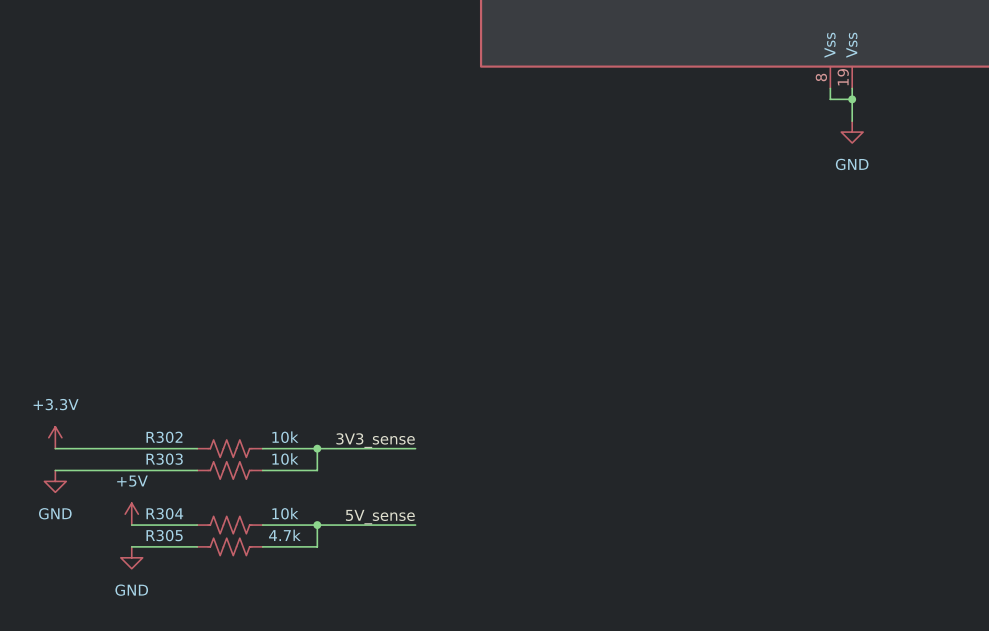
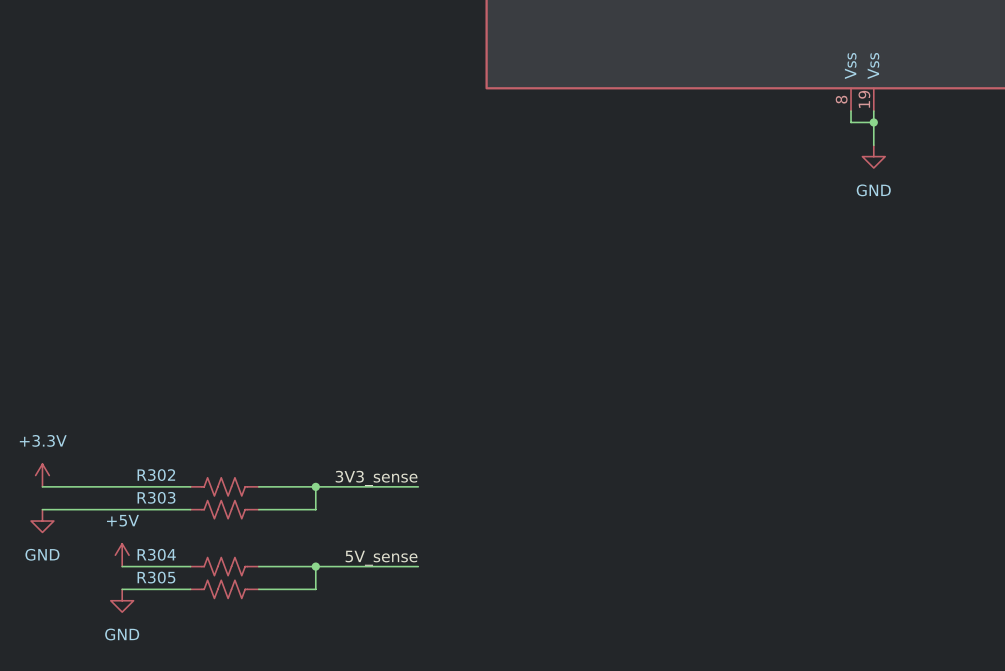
R302 value: 10k (285, 437) -> none
R303 value: 10k (285, 459) -> none
R304 value: 10k (285, 513) -> none
R305 value: 4.7k (284, 535) -> none

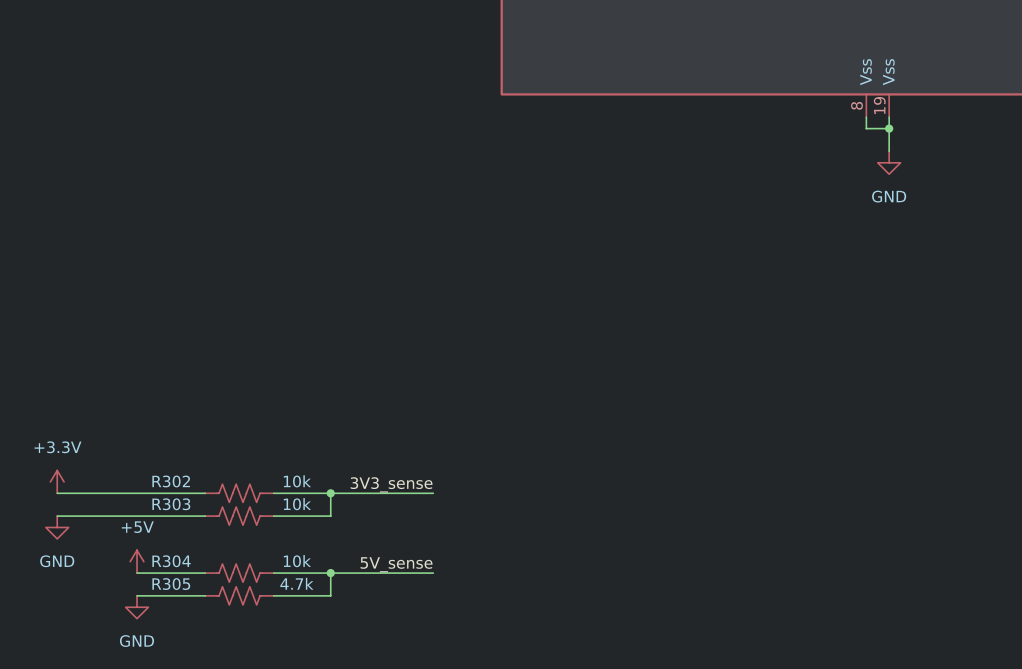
R302 value: none -> 10k (297, 481)
R303 value: none -> 10k (297, 504)
R304 value: none -> 10k (297, 561)
R305 value: none -> 4.7k (296, 583)

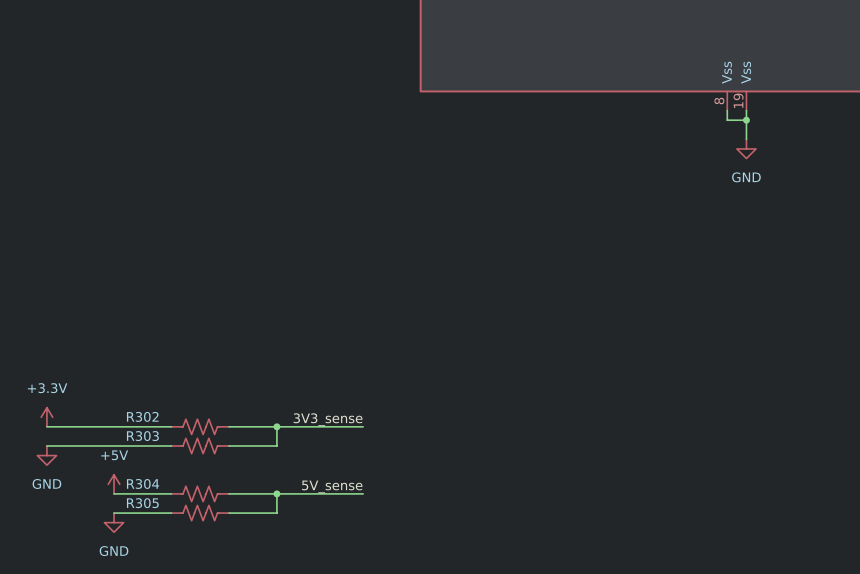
R302 value: 10k (297, 481) -> none
R303 value: 10k (297, 504) -> none
R304 value: 10k (297, 561) -> none
R305 value: 4.7k (296, 583) -> none

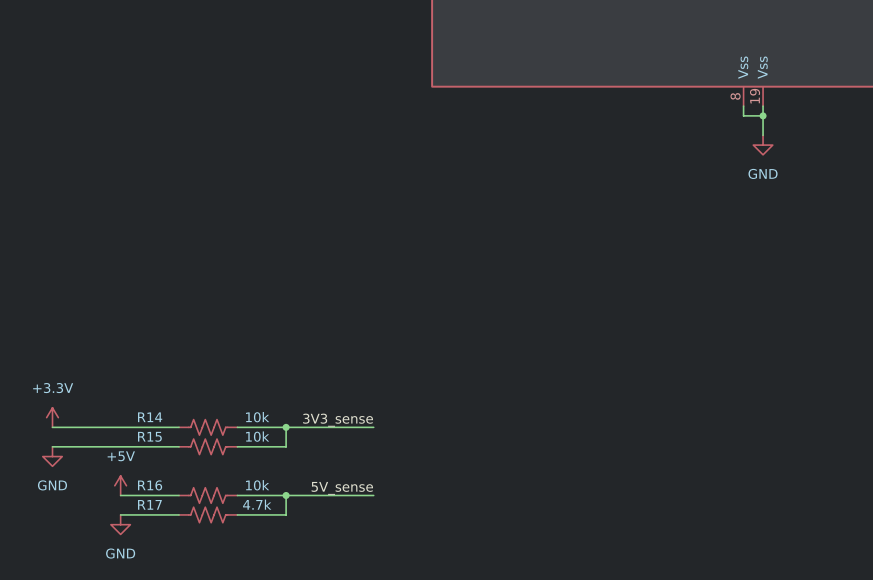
R302 name: R302 (142, 416) -> R14 (150, 417)
R302 value: none -> 10k (257, 417)
R303 value: none -> 10k (257, 436)
R303 name: R303 (142, 436) -> R15 (149, 436)
R304 name: R304 (143, 483) -> R16 (150, 485)
R304 value: none -> 10k (257, 485)
R305 value: none -> 4.7k (257, 504)
R305 name: R305 (142, 503) -> R17 (149, 504)

